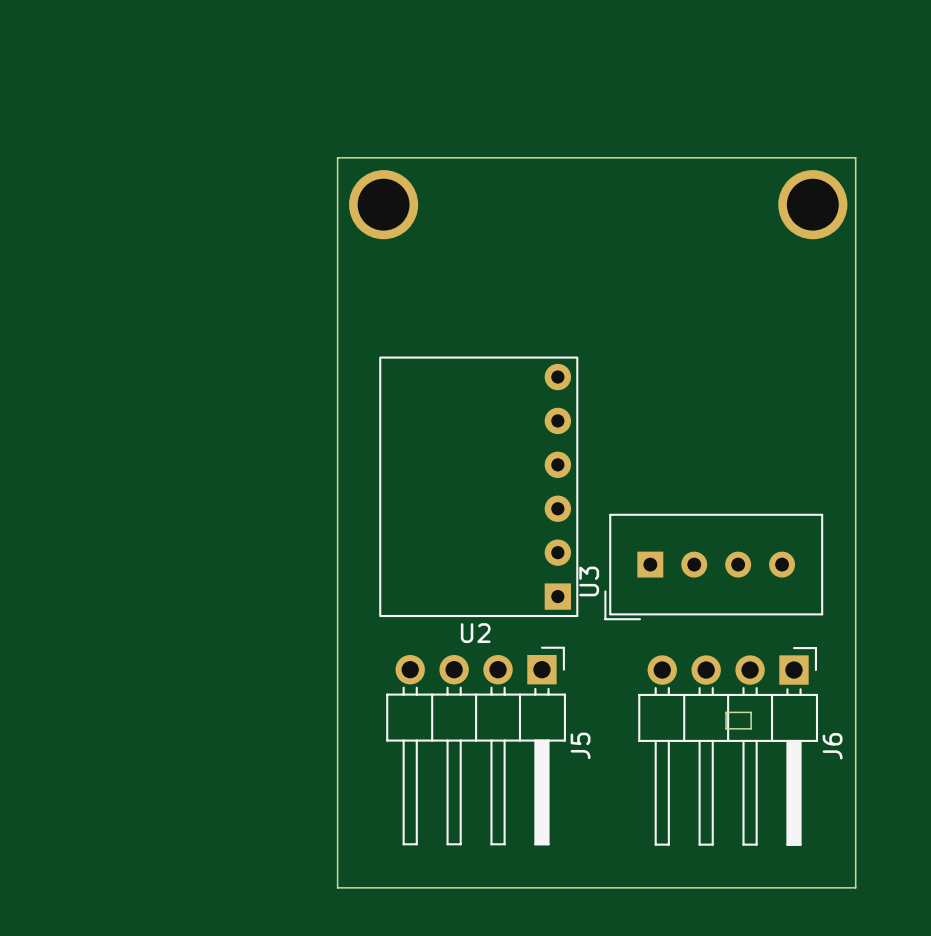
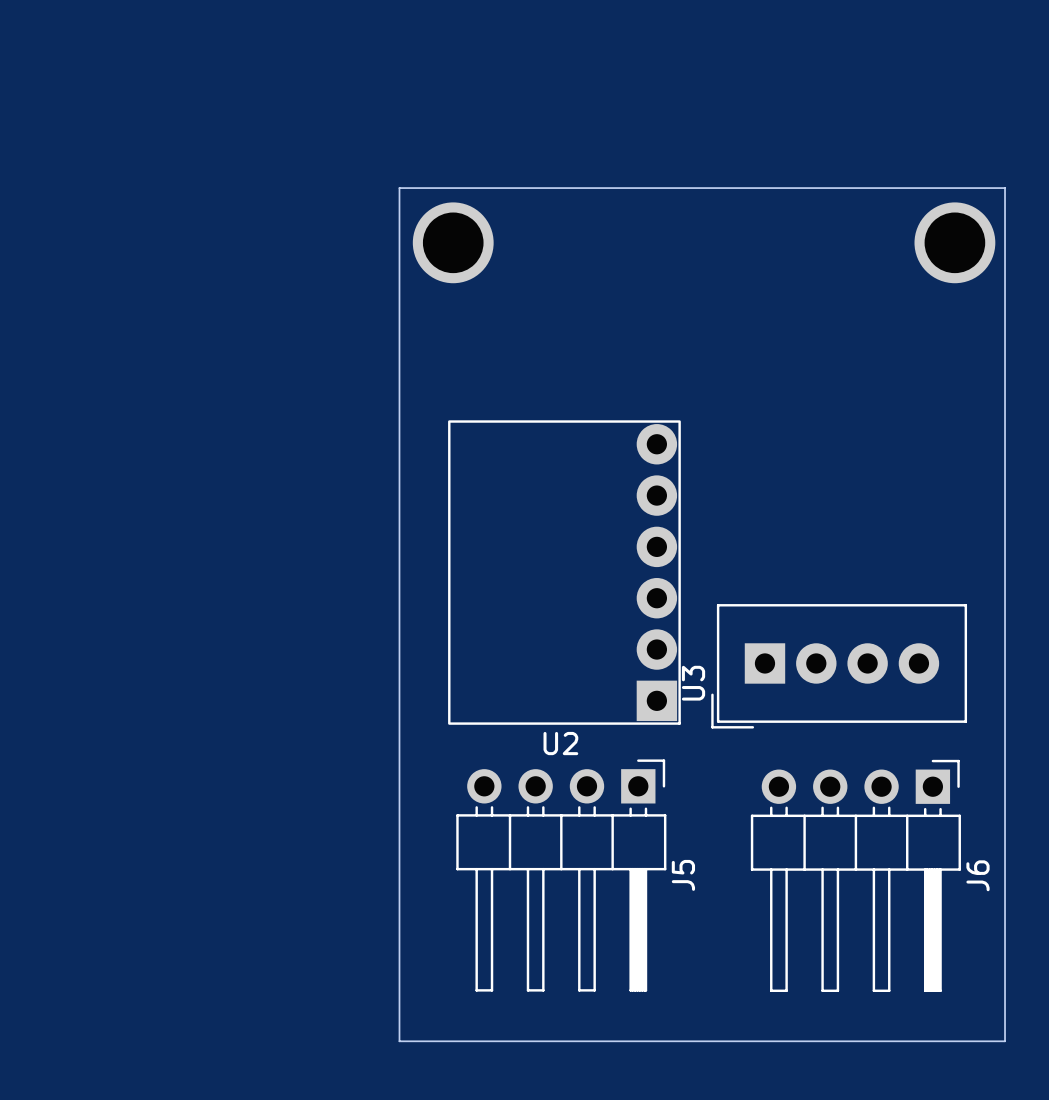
U2 footprint: [379, 356, 579, 618] -> [448, 420, 681, 725]
U3 footprint: [604, 513, 824, 621] -> [711, 604, 968, 729]
board edge: (726, 712) (751, 712) (751, 728) (726, 728) (726, 712) -> none

